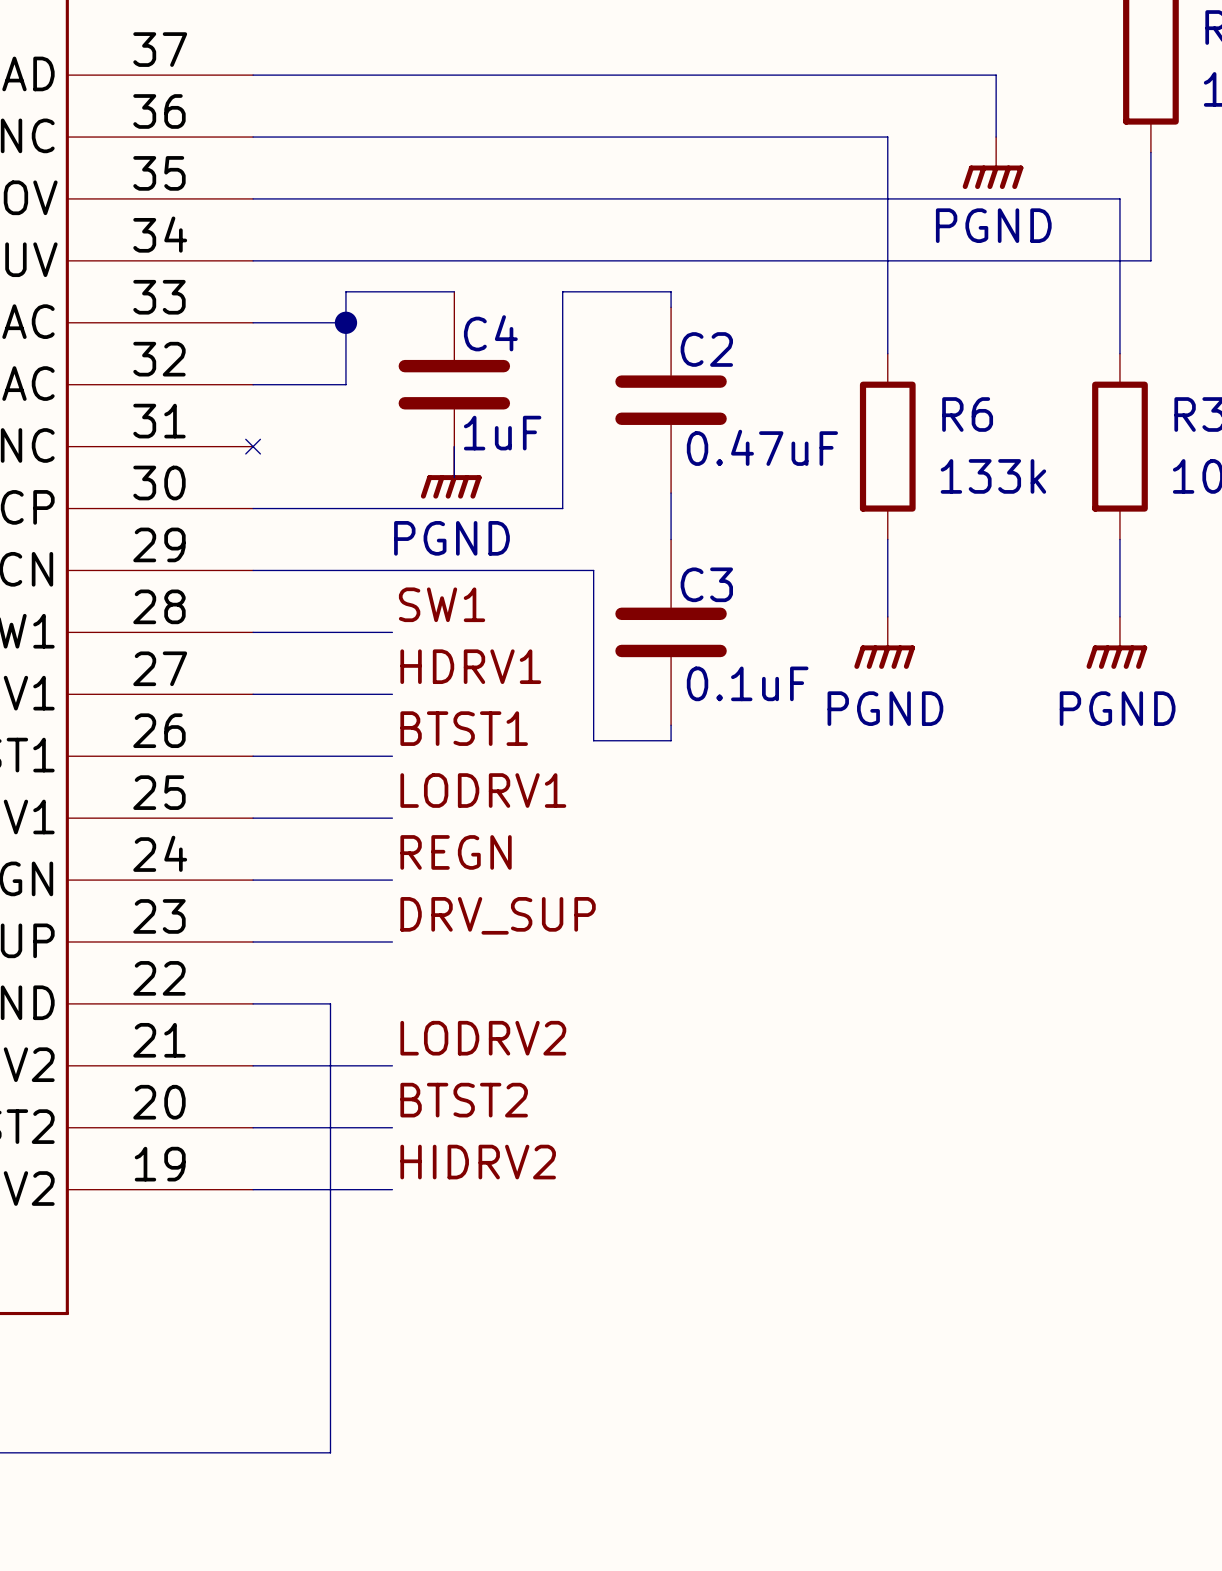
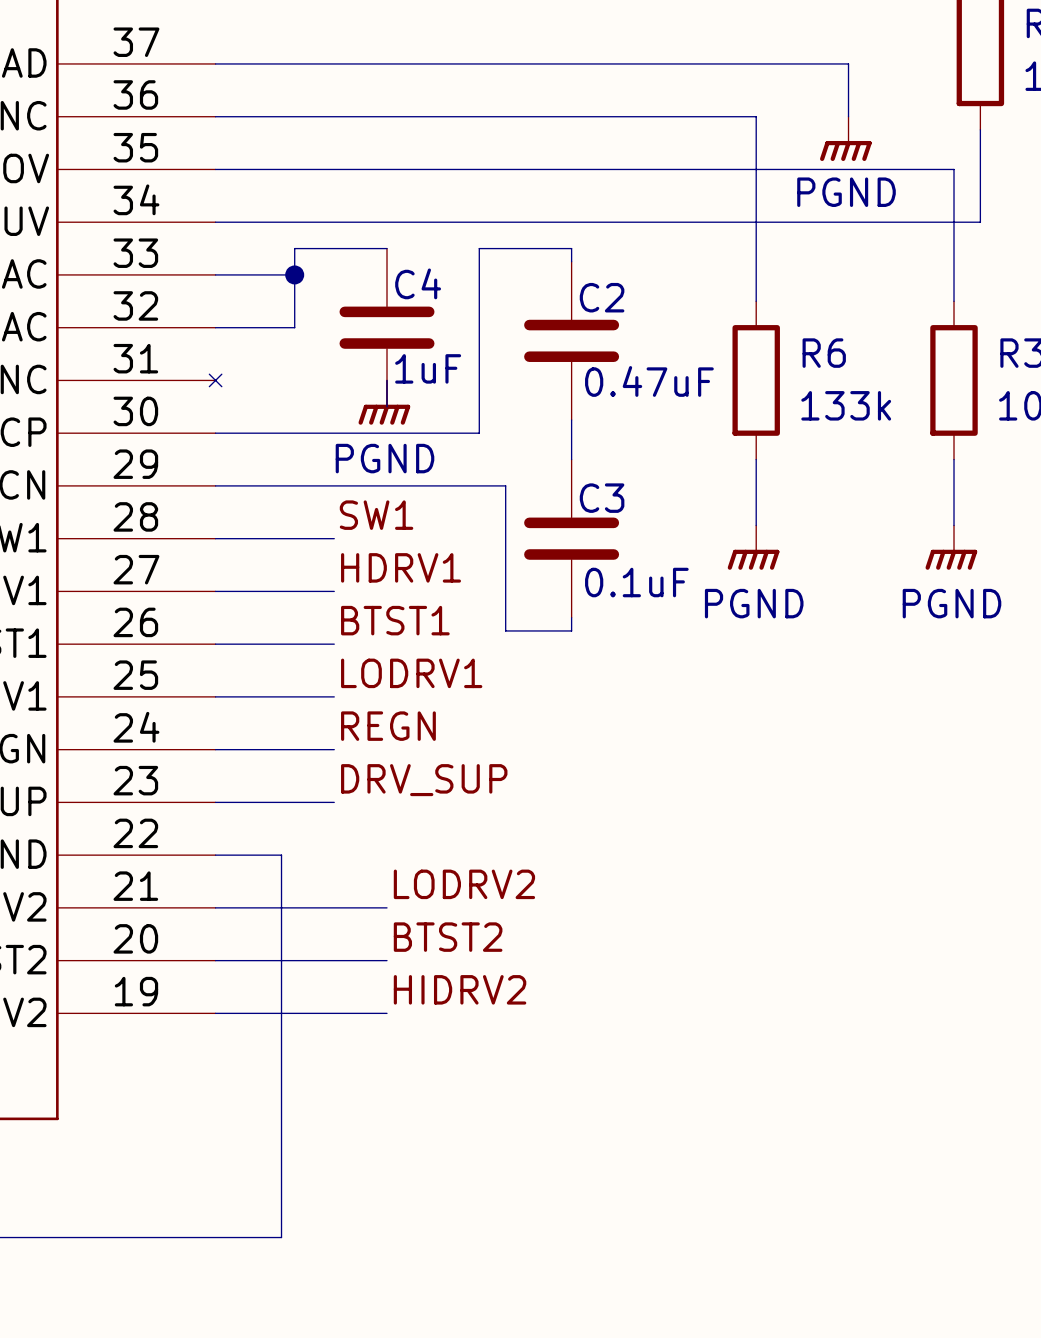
label position: LODRV2 (483, 1038) -> LODRV2 (464, 884)
wire: none -> (334, 907) (387, 907)
label position: BTST2 (464, 1100) -> BTST2 (448, 937)
wire: none -> (334, 960) (387, 960)
label position: HIDRV2 (478, 1162) -> HIDRV2 (460, 989)
wire: none -> (334, 1013) (387, 1013)

